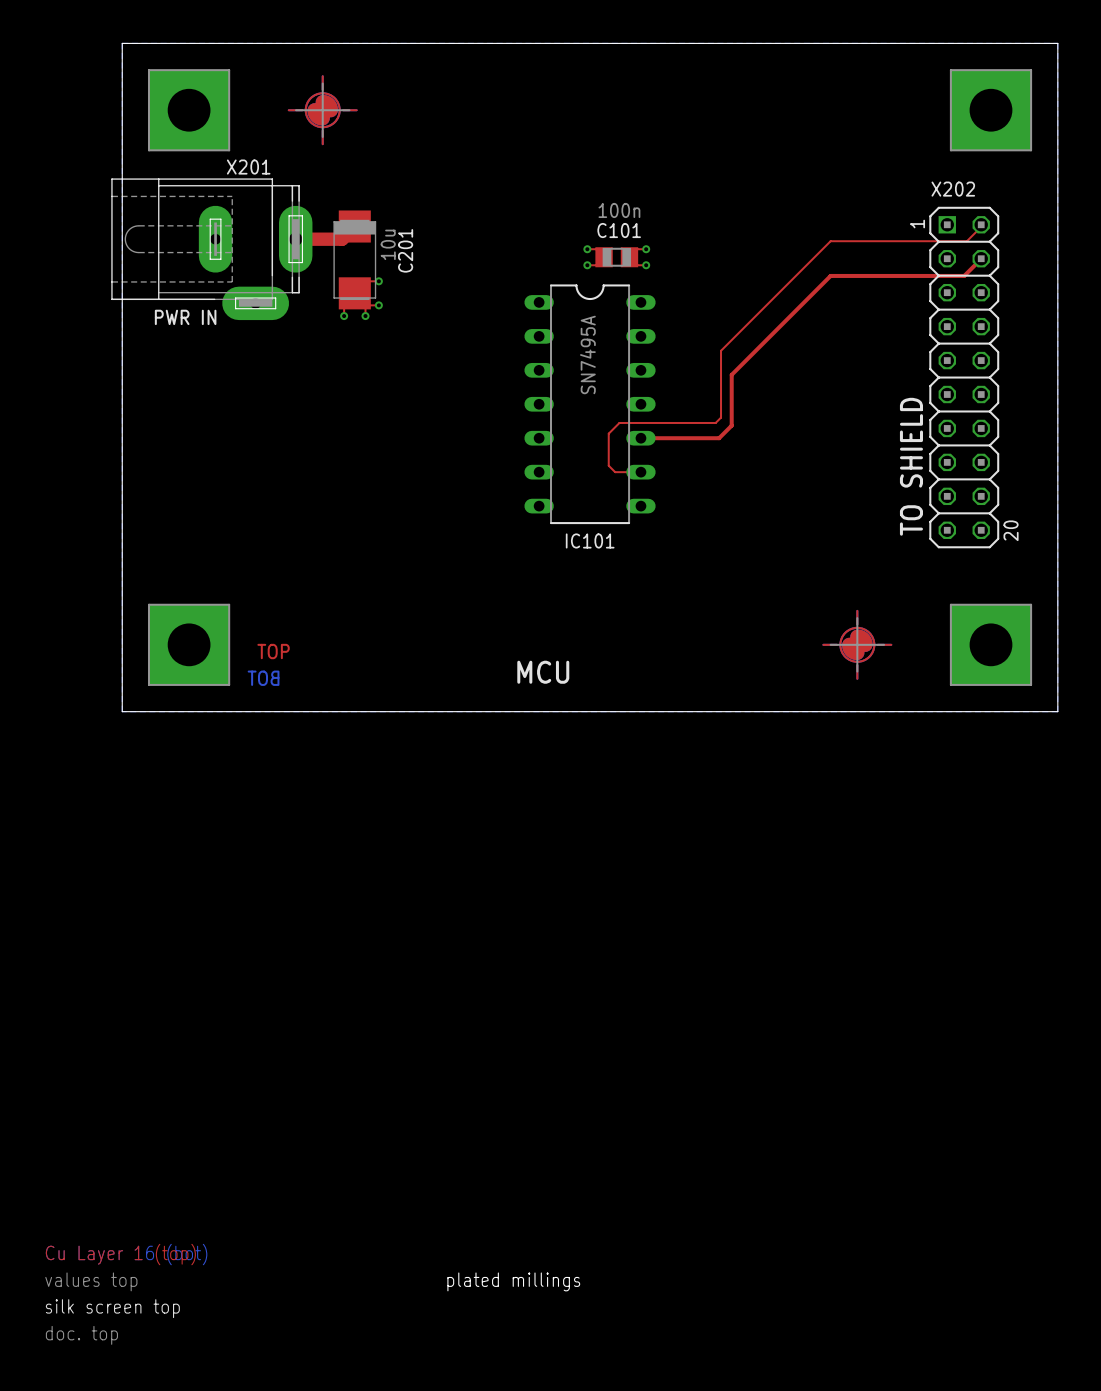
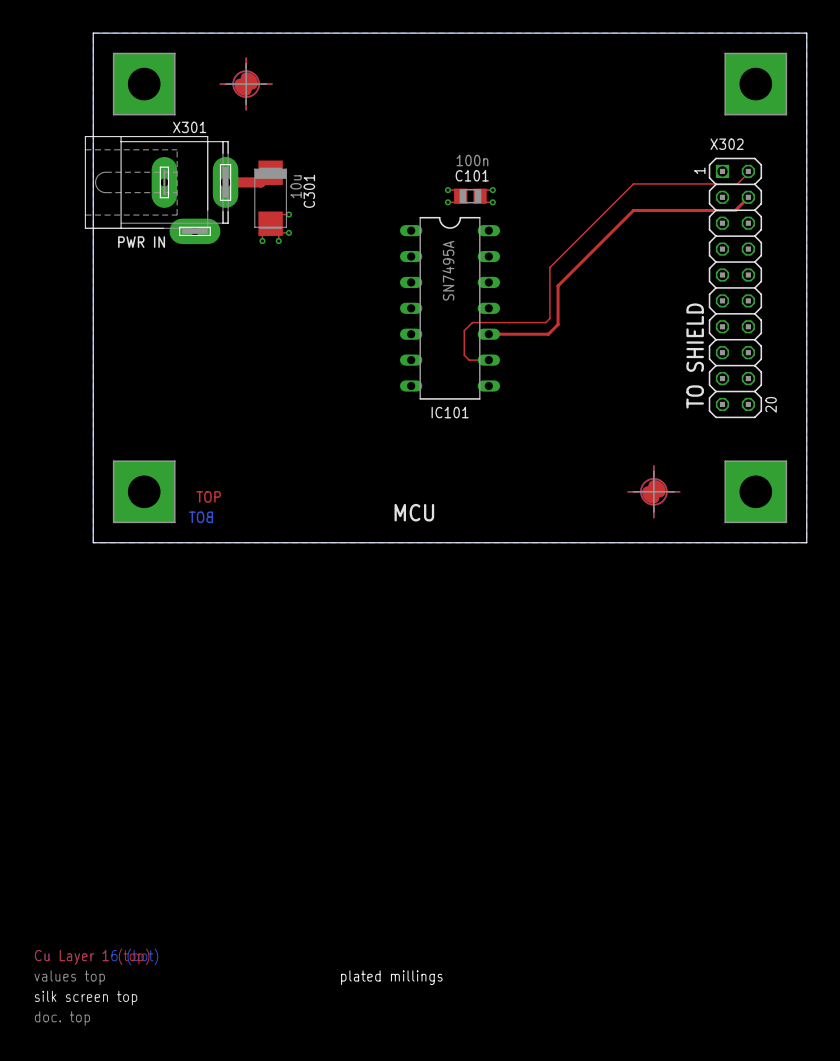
X201 name: X201 (248, 167) -> X301 (189, 127)
X202 name: X202 (953, 189) -> X302 (727, 144)
C201 name: C201 (405, 250) -> C301 (309, 191)

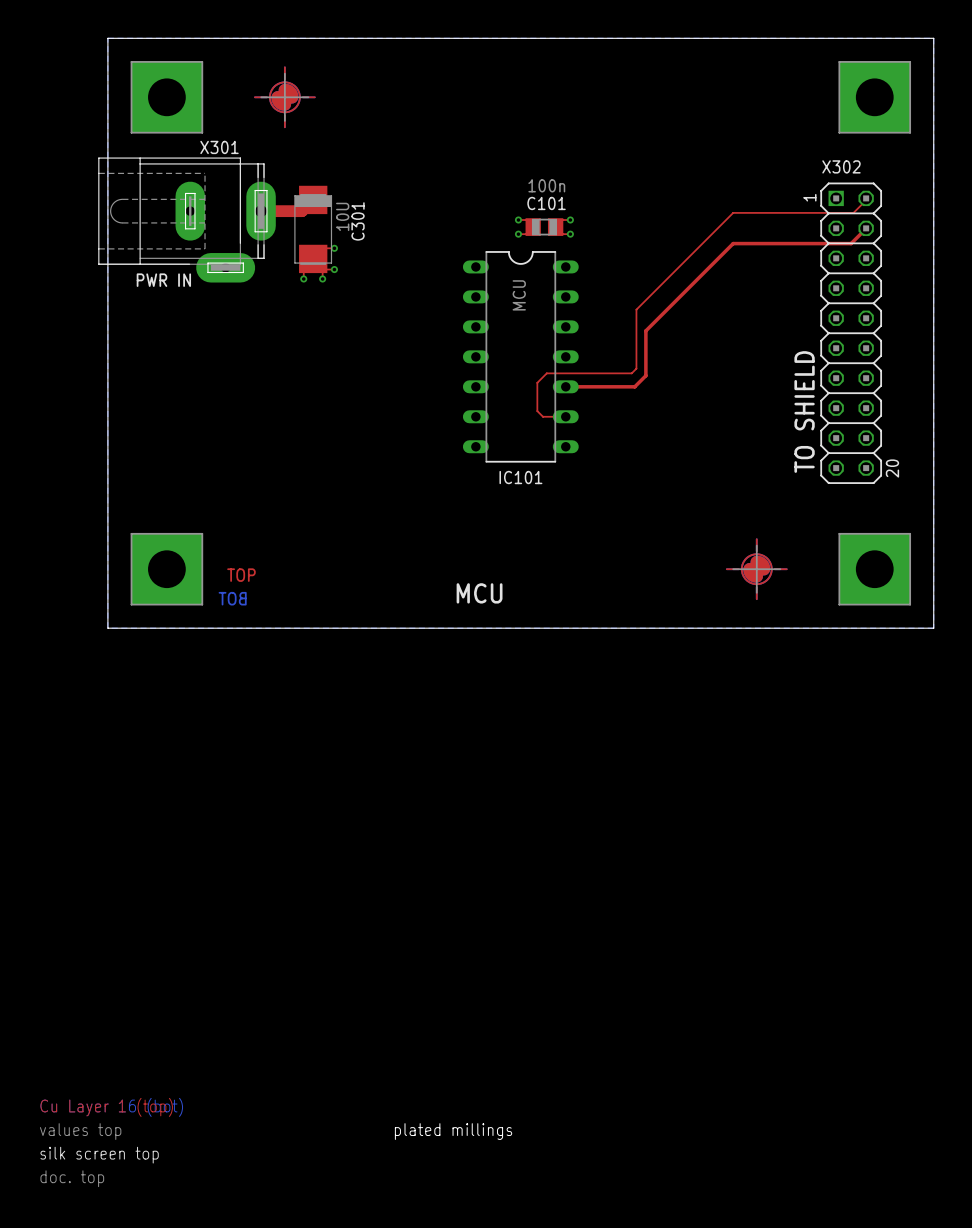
C301 value: 10u (296, 186) -> 10U (342, 216)
IC101 value: SN7495A (448, 270) -> MCU (519, 295)

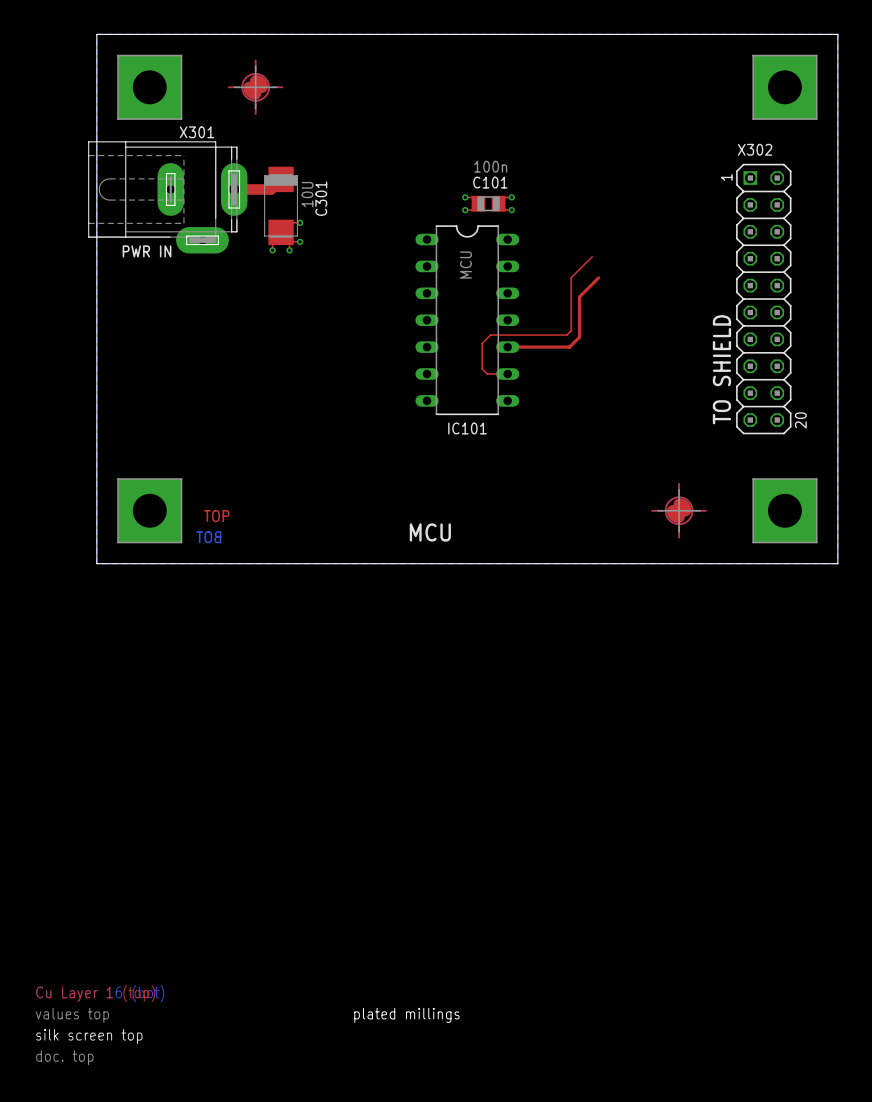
top track: (866, 198) (853, 212) (733, 212) (660, 286) -> none
top track: (866, 228) (851, 243) (733, 243) (667, 309) -> none

